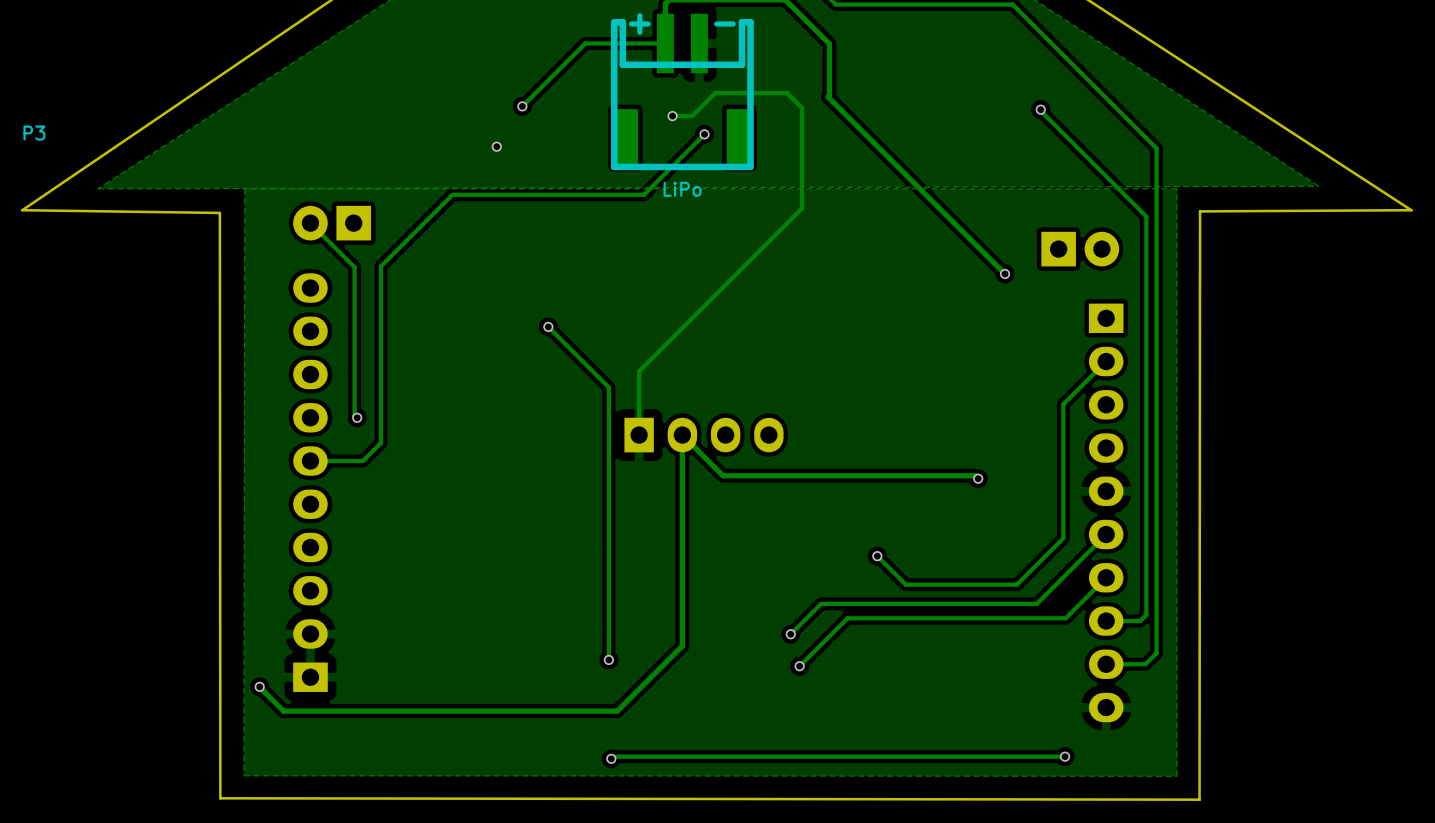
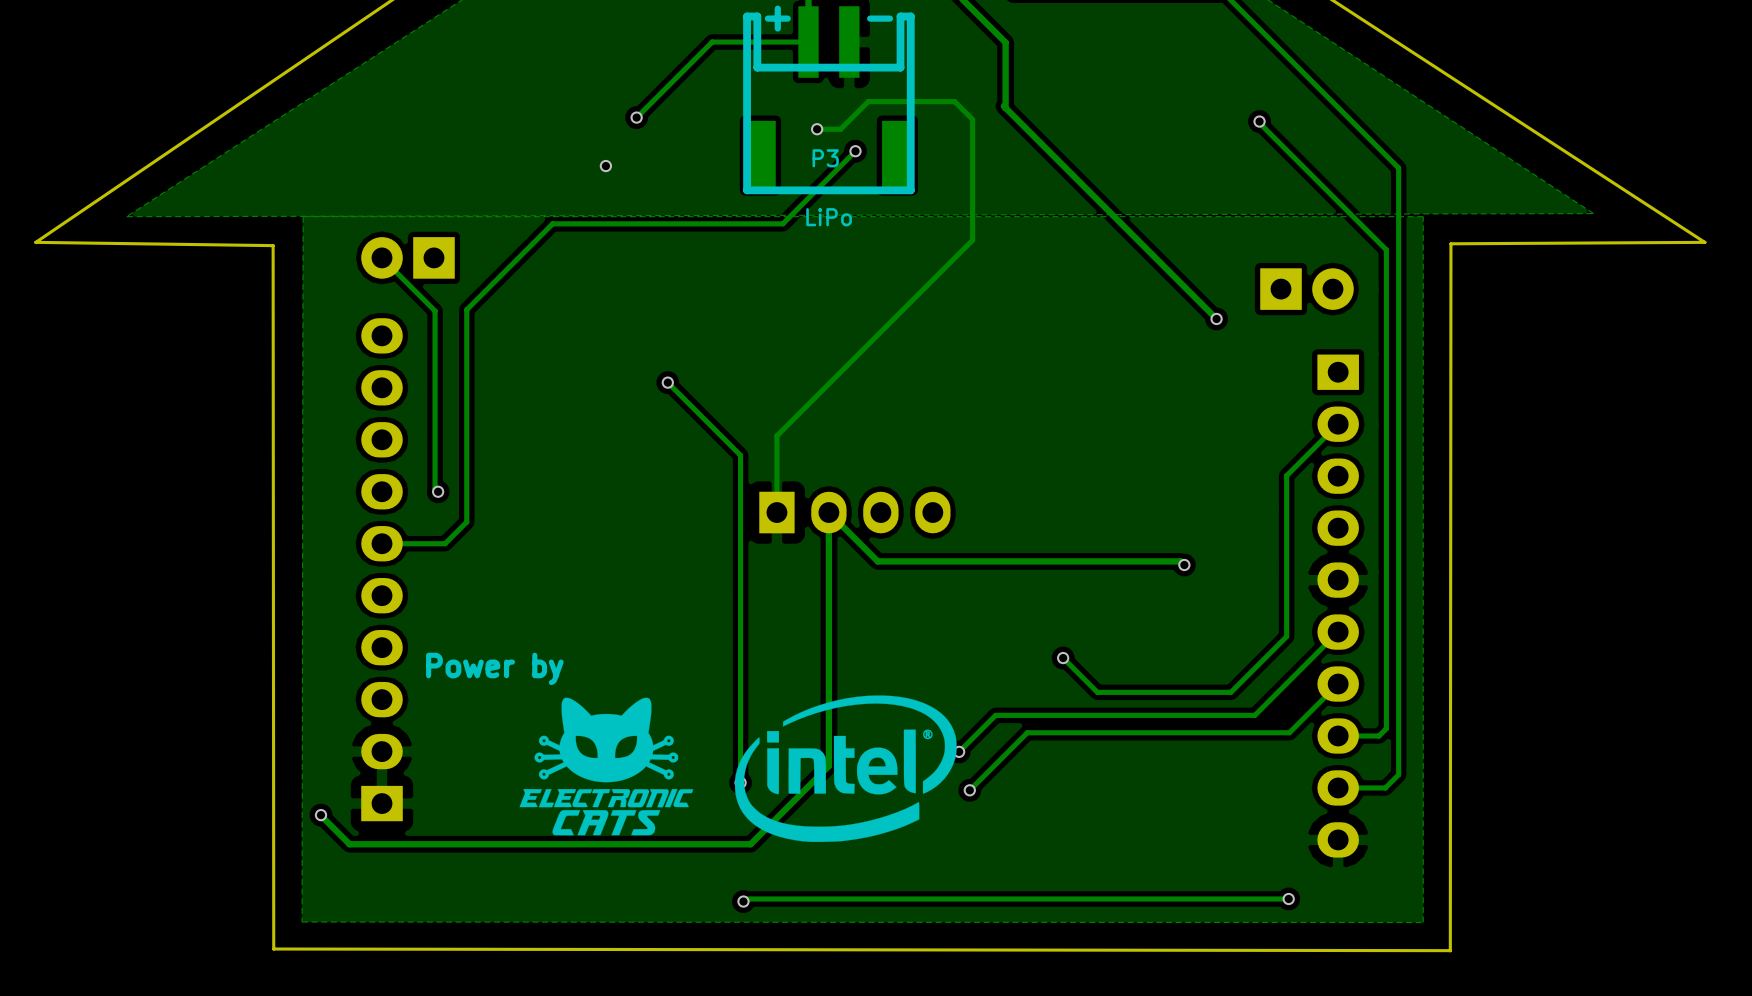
P3 name position: P3 (34, 133) -> P3 (825, 158)
text: none -> Power by (494, 668)
drawing: none -> [734, 695, 957, 842]
drawing: none -> [519, 697, 694, 836]

